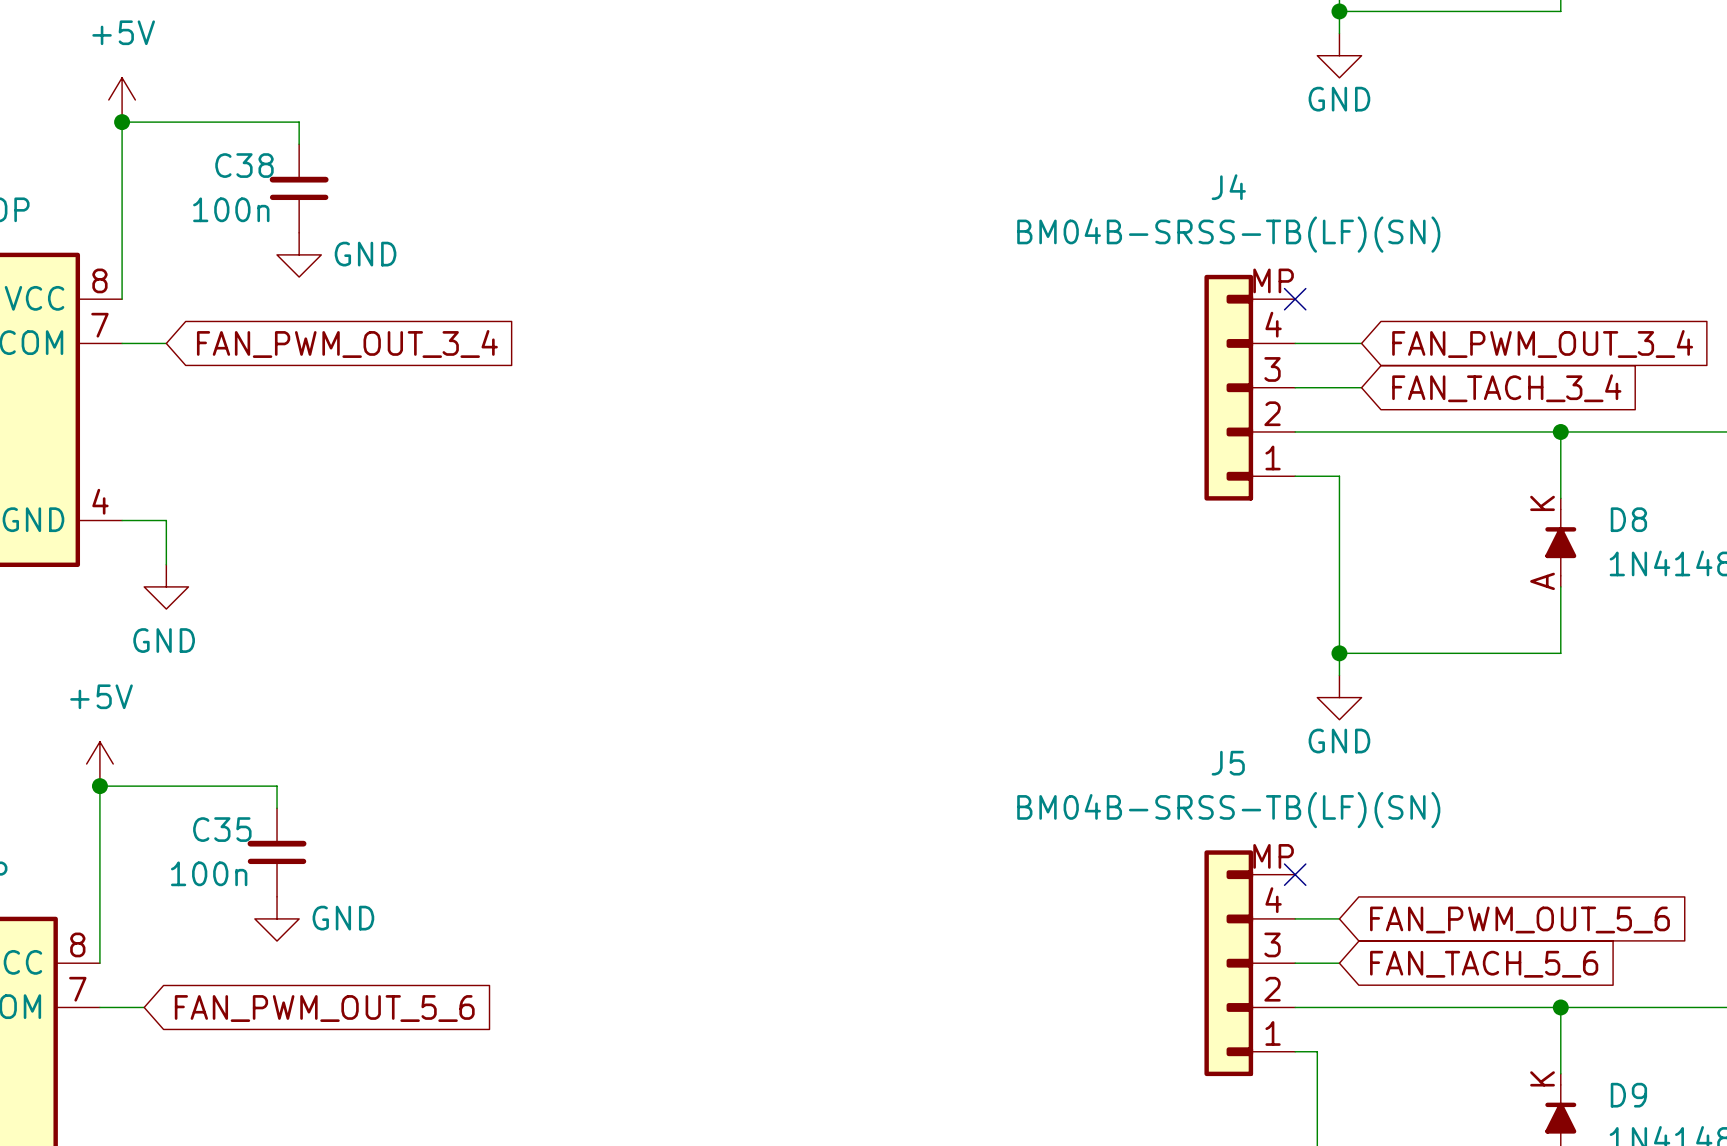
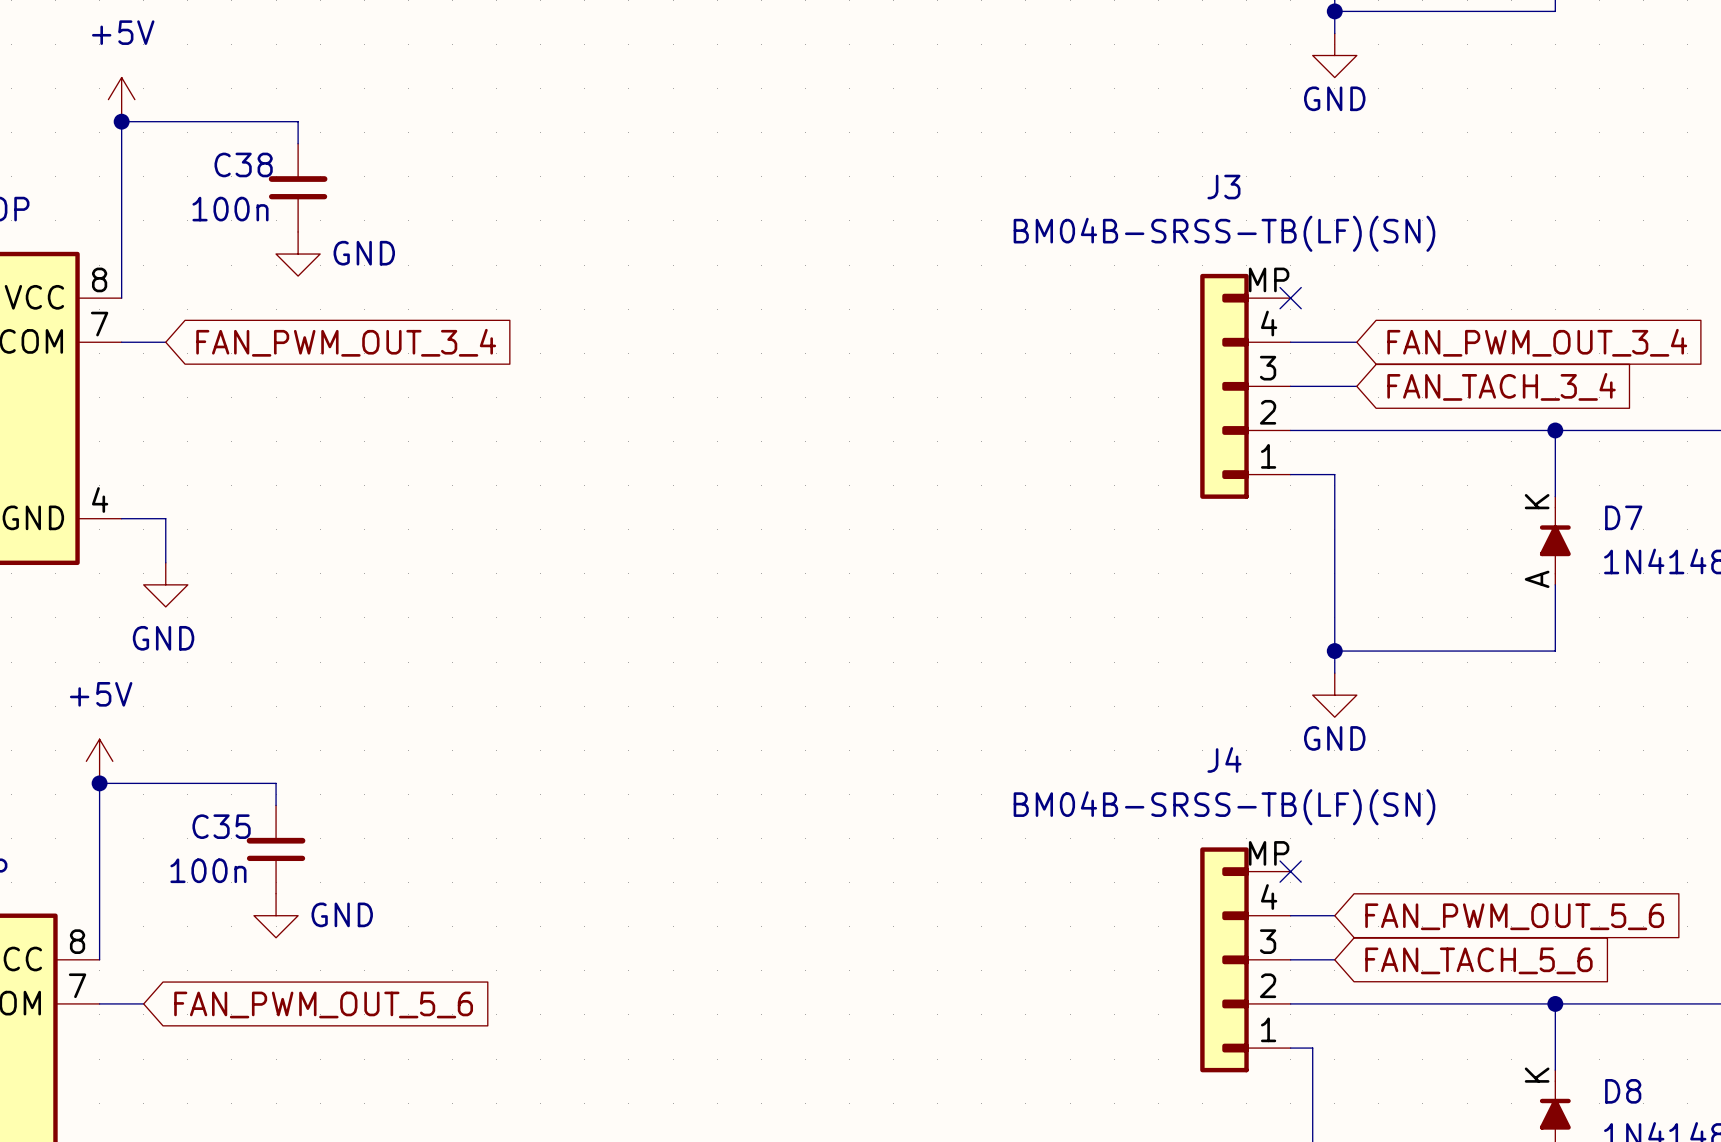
J4 name: J4 (1228, 187) -> J3 (1223, 187)
D8 name: D8 (1628, 519) -> D7 (1623, 517)
J5 name: J5 (1228, 763) -> J4 (1224, 759)
D9 name: D9 (1628, 1095) -> D8 (1623, 1091)

